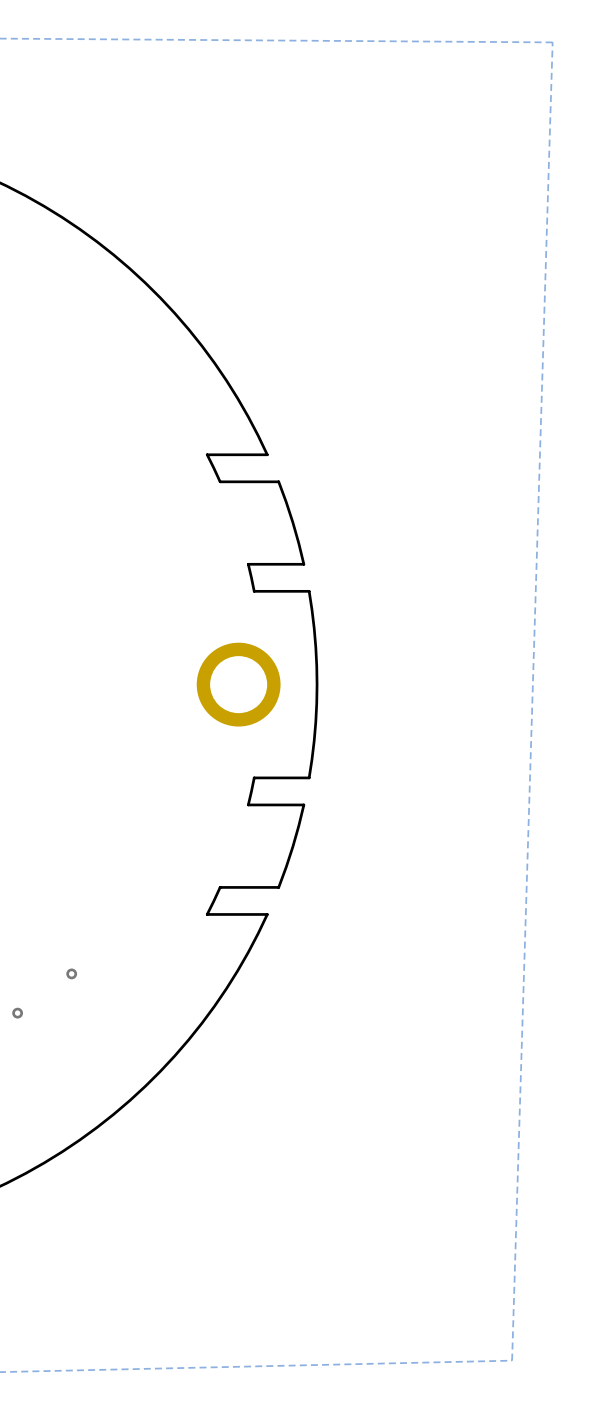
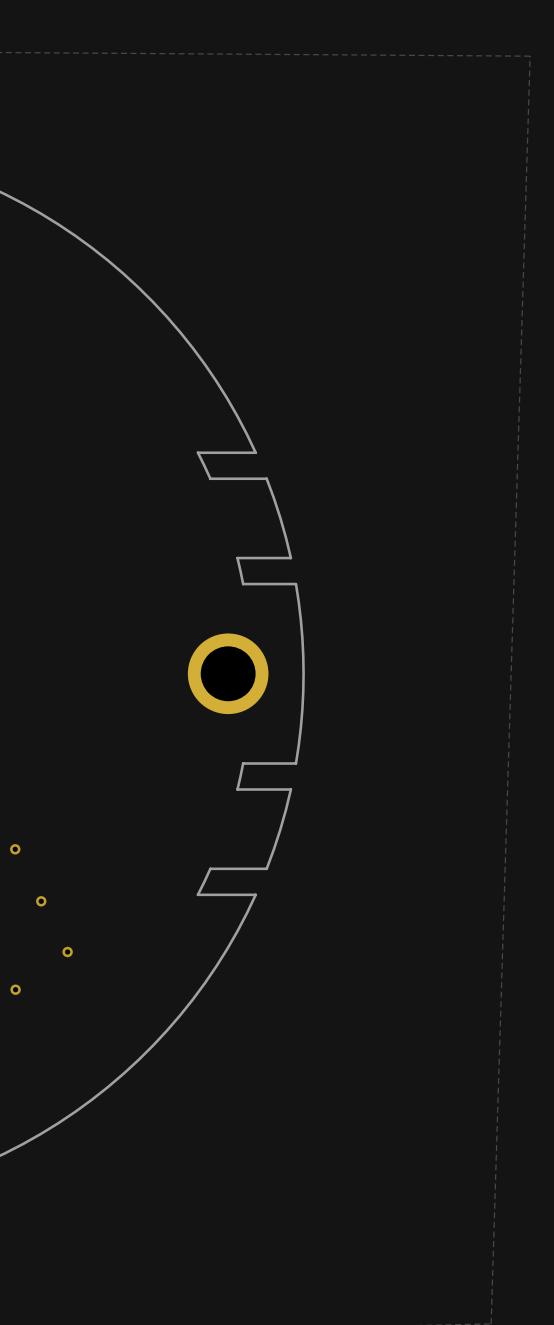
via: none -> (15, 849)
via: none -> (41, 901)

